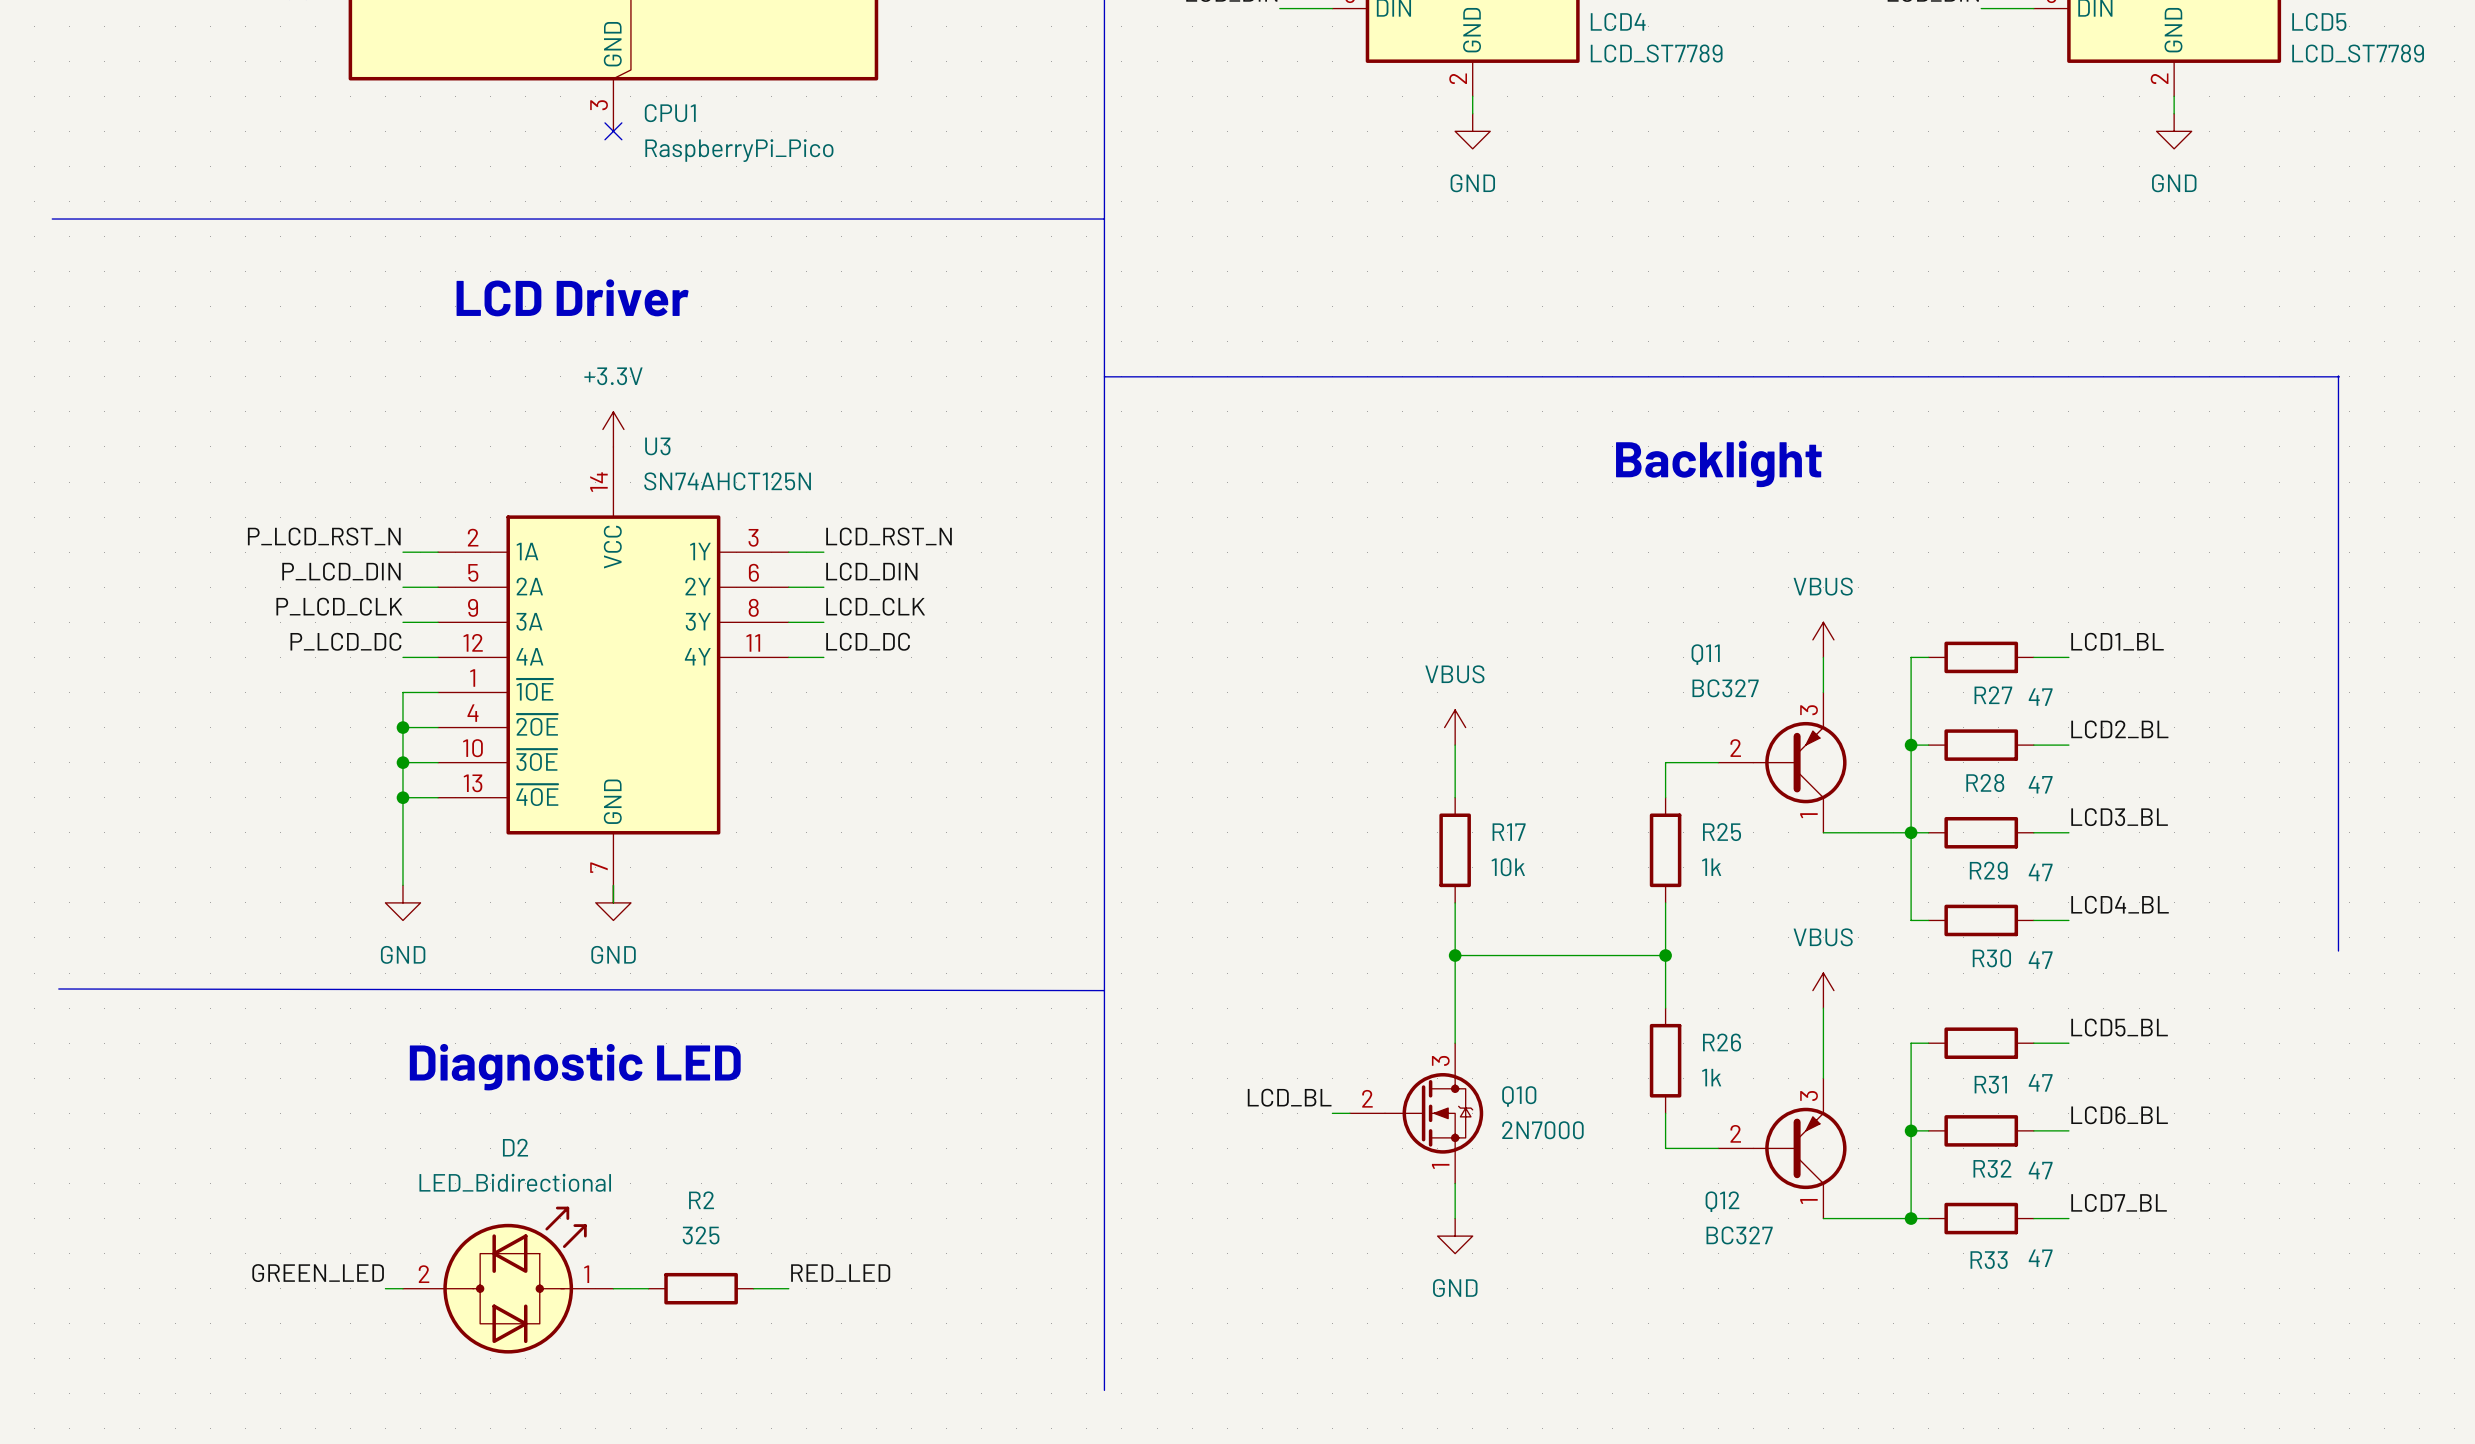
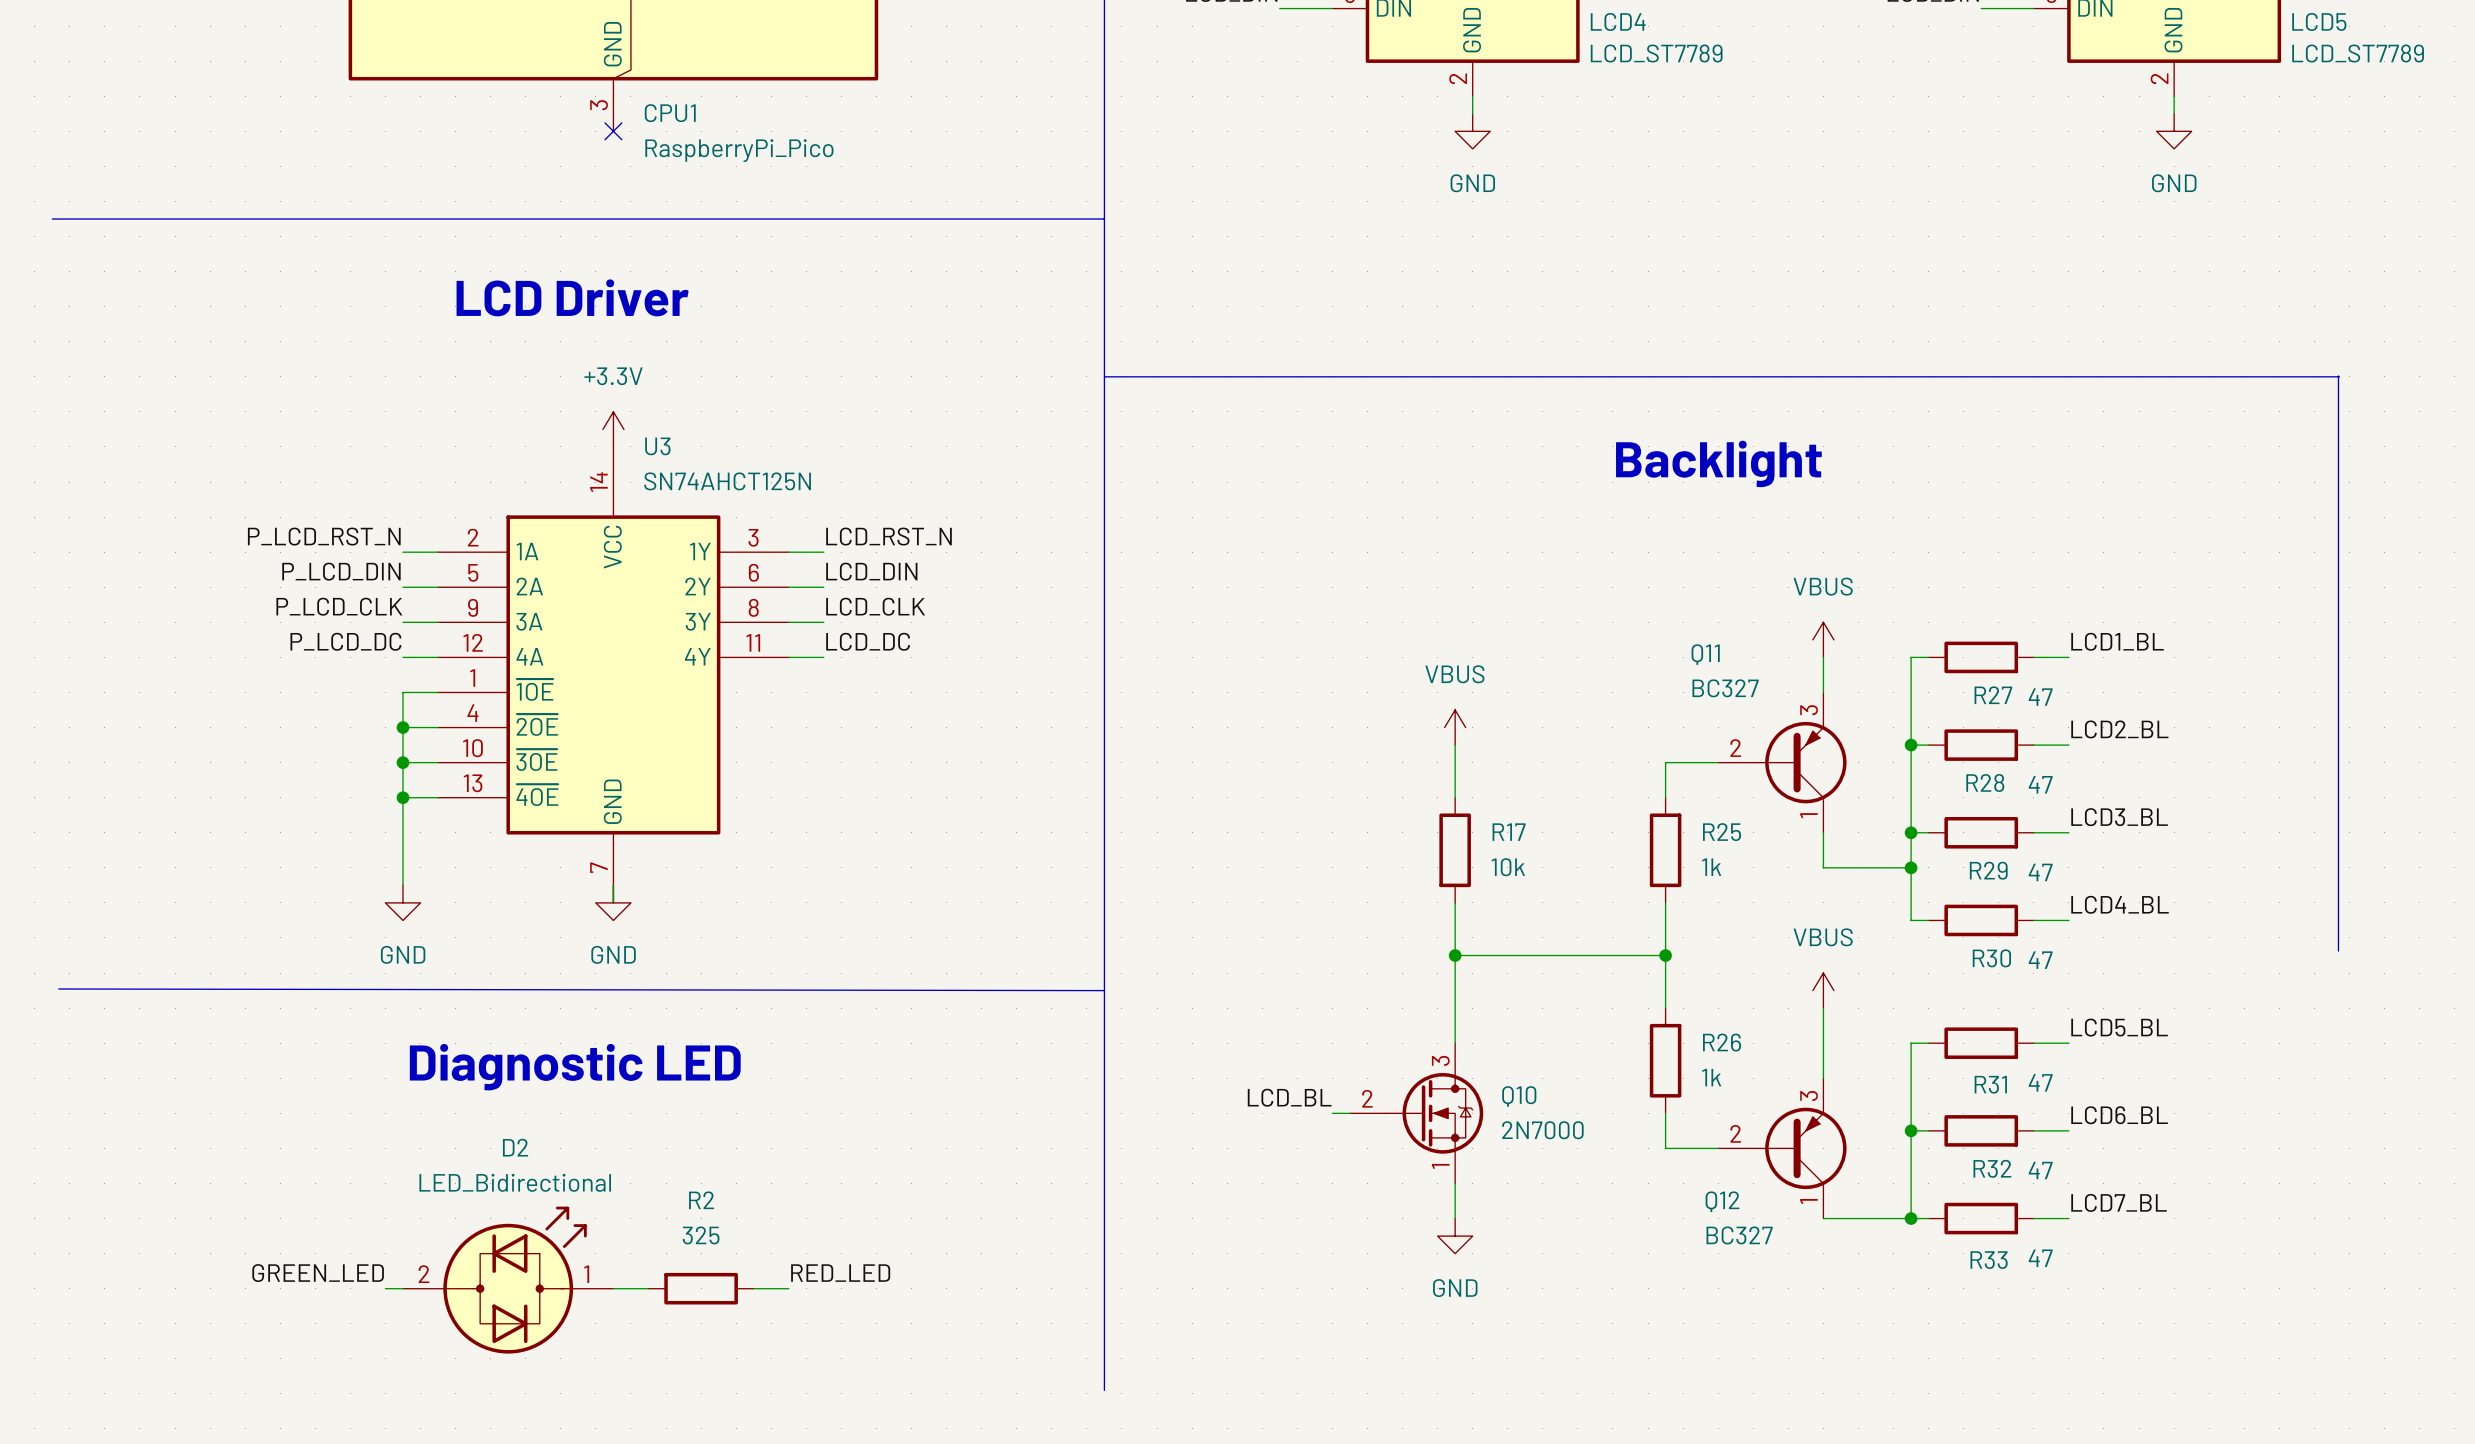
wire: (1823, 832) (1911, 832) -> (1823, 832) (1823, 867) (1911, 867)
junction: none -> (1911, 867)

